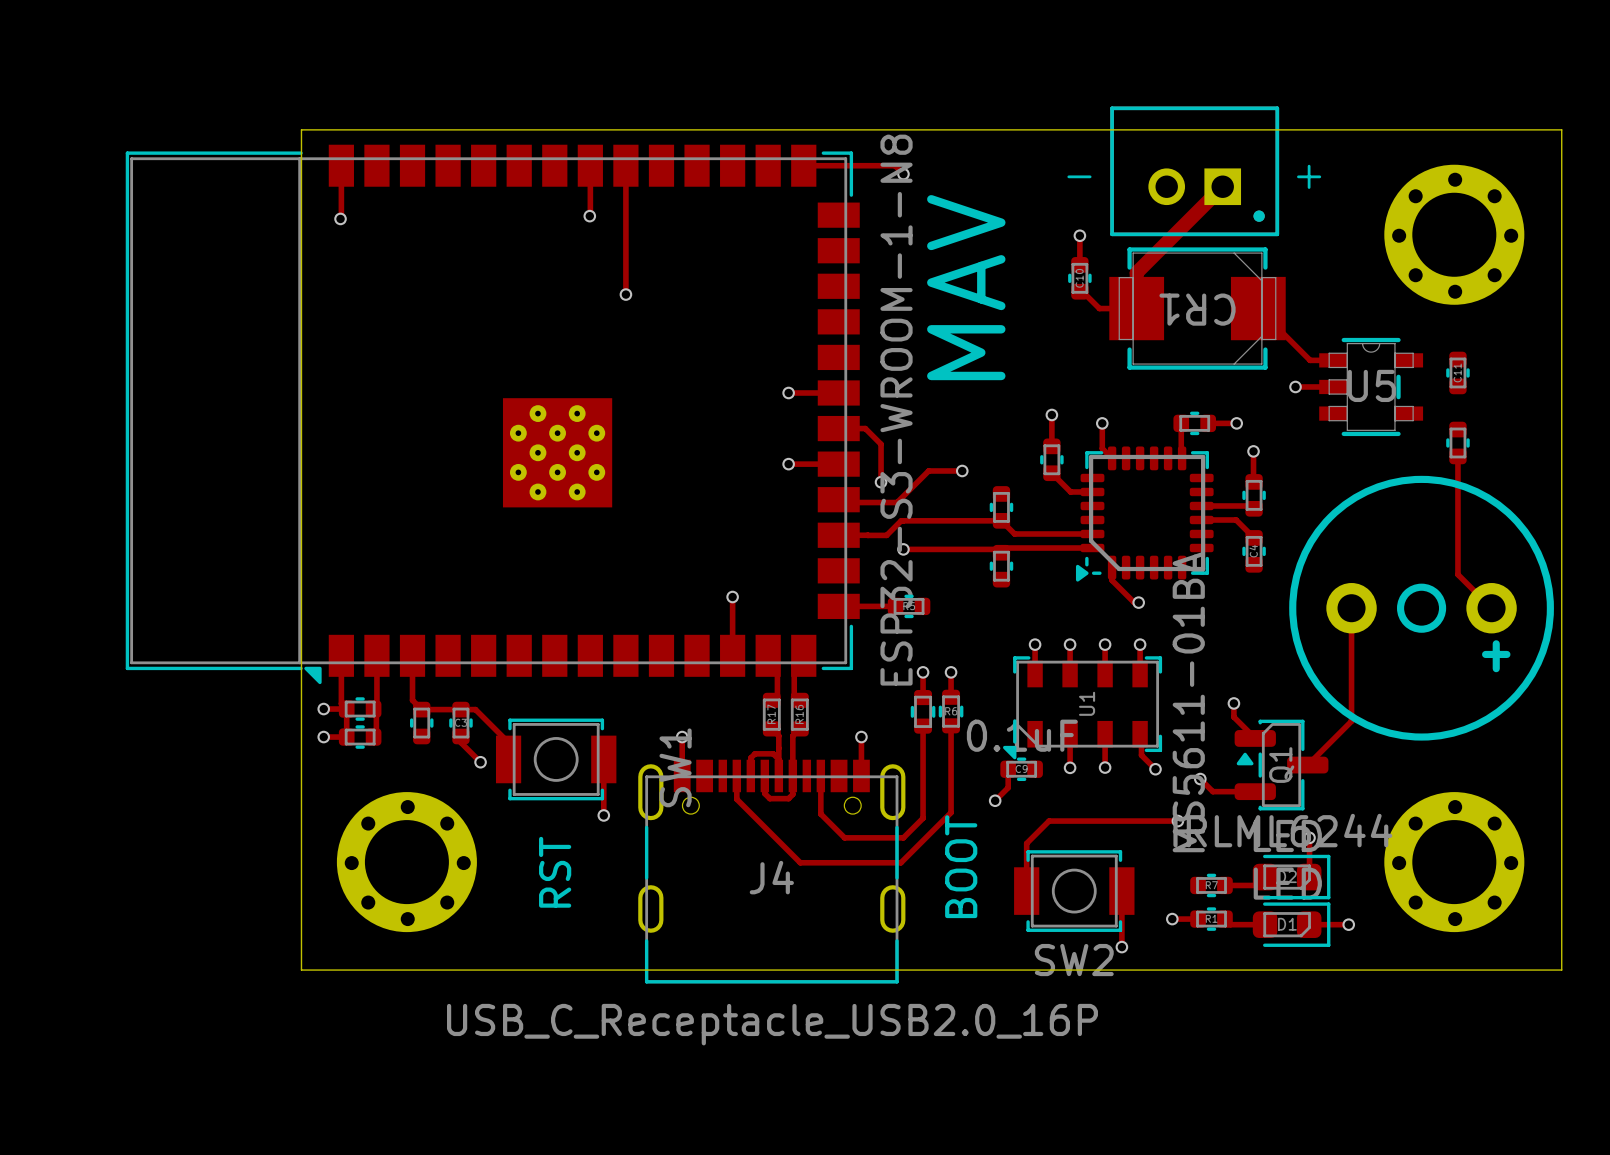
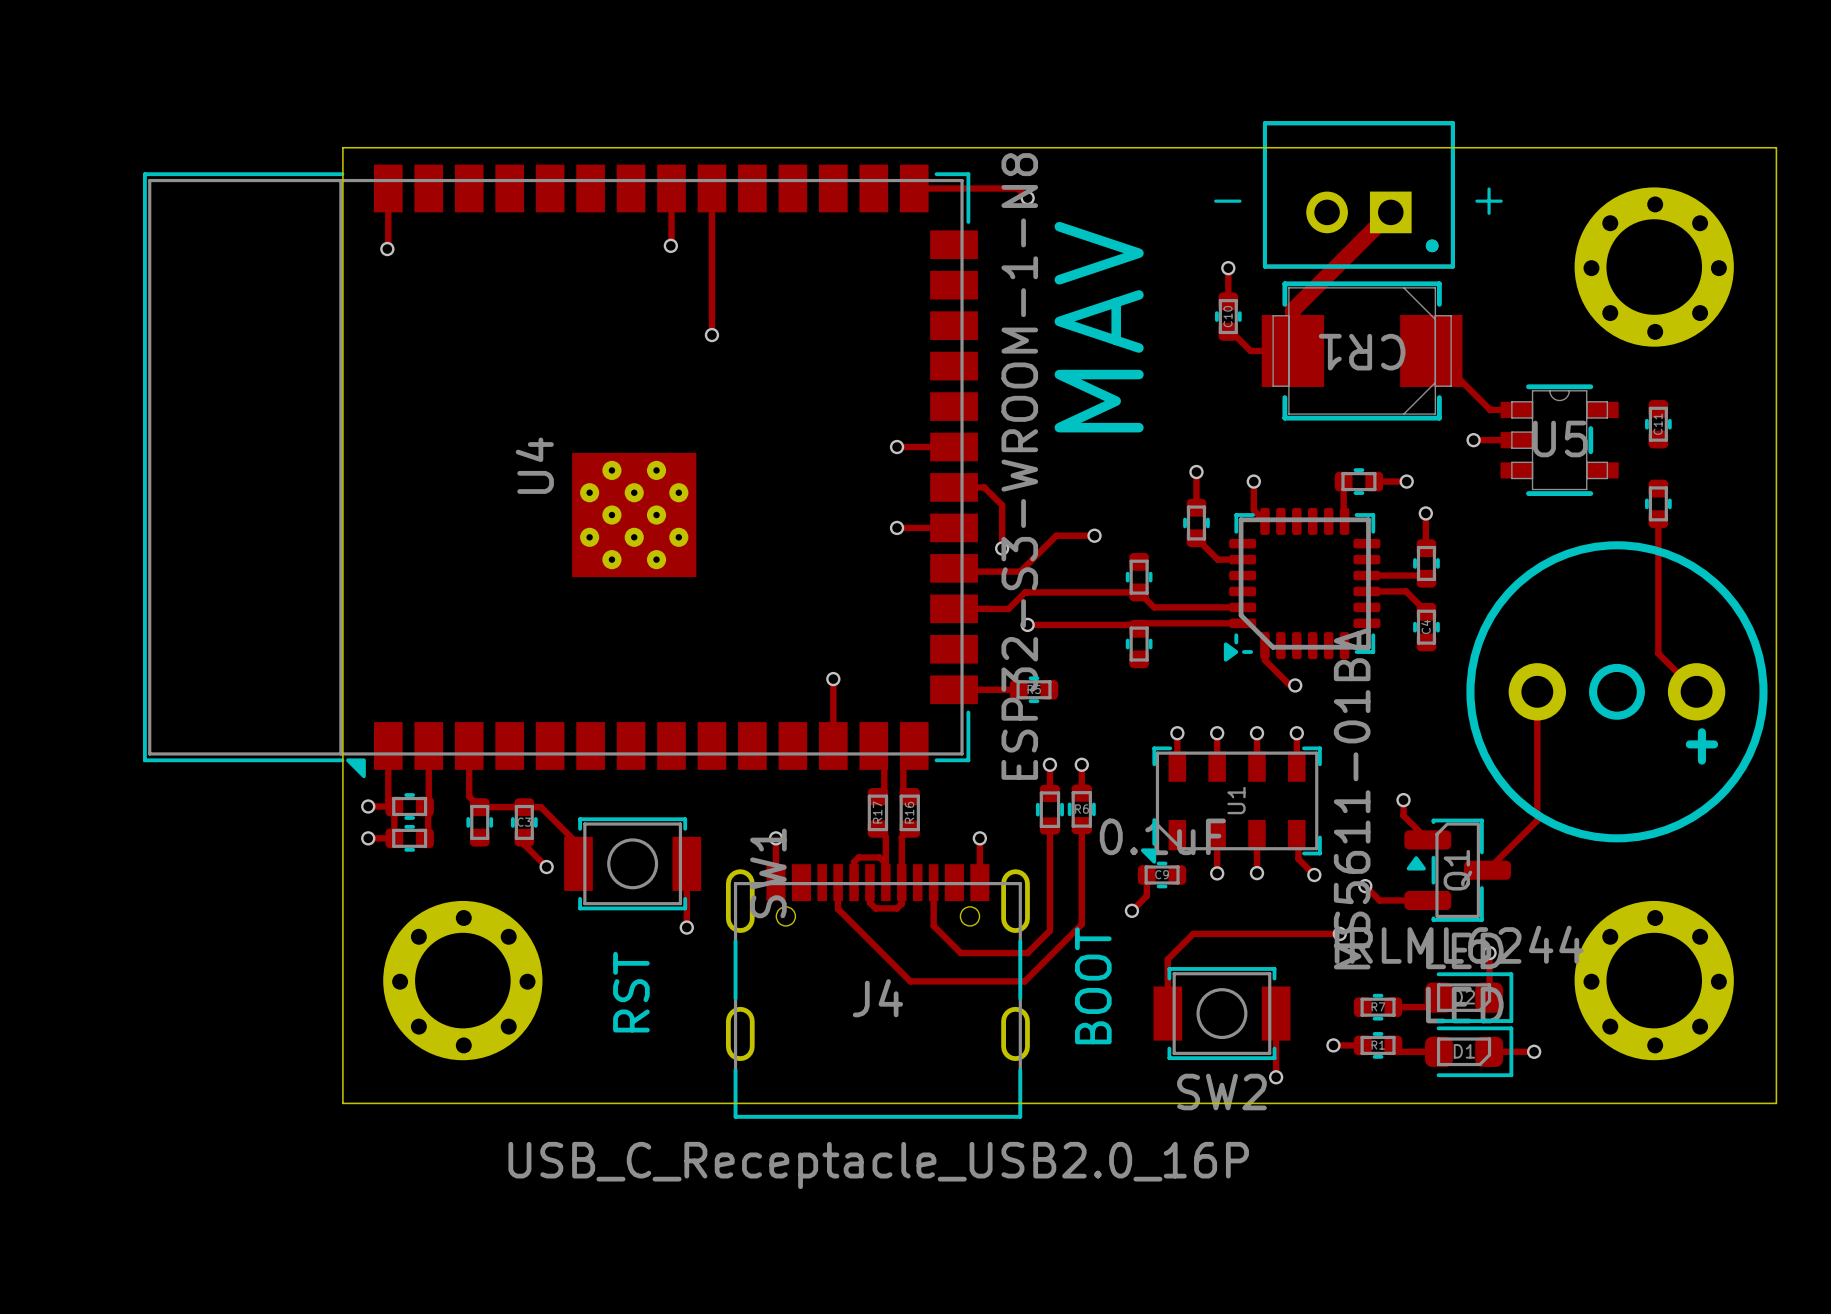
U4 name: none -> U4 (534, 465)

